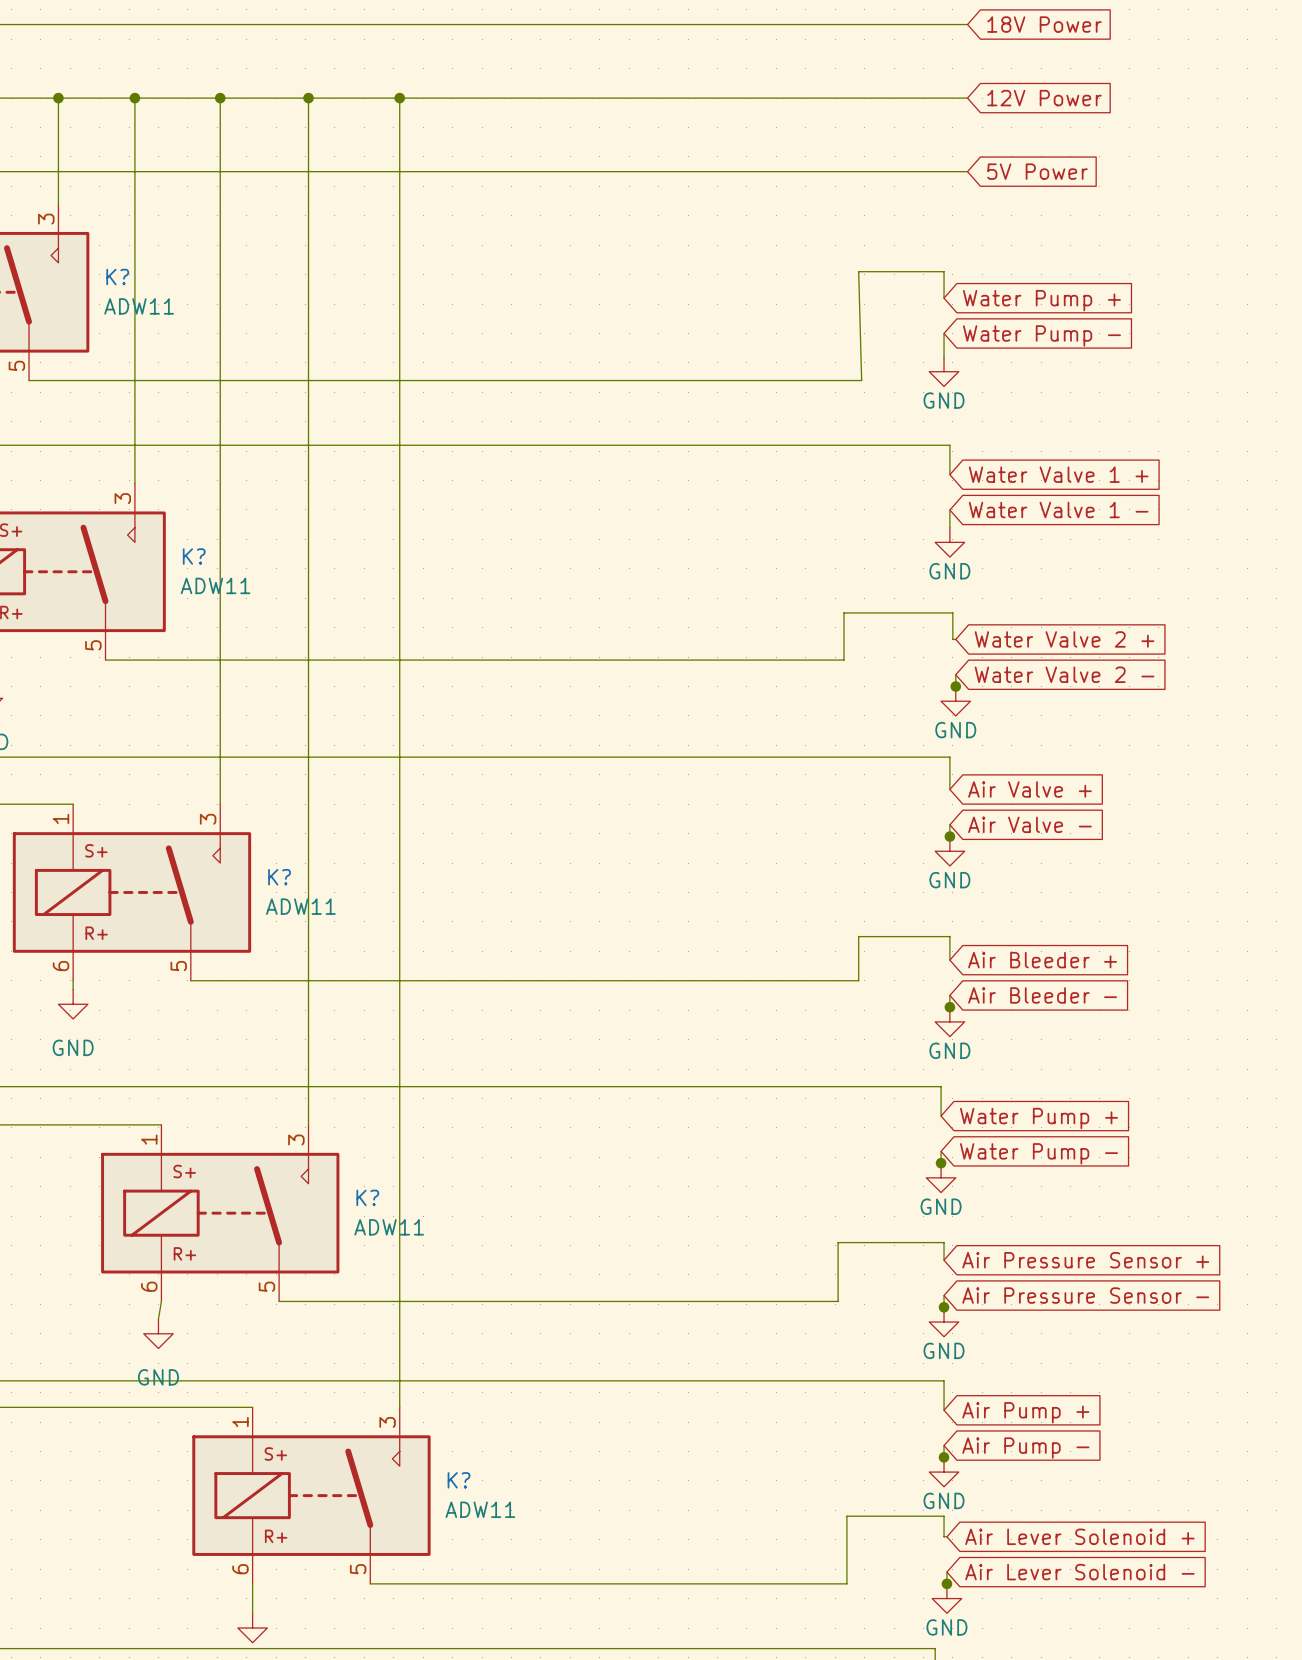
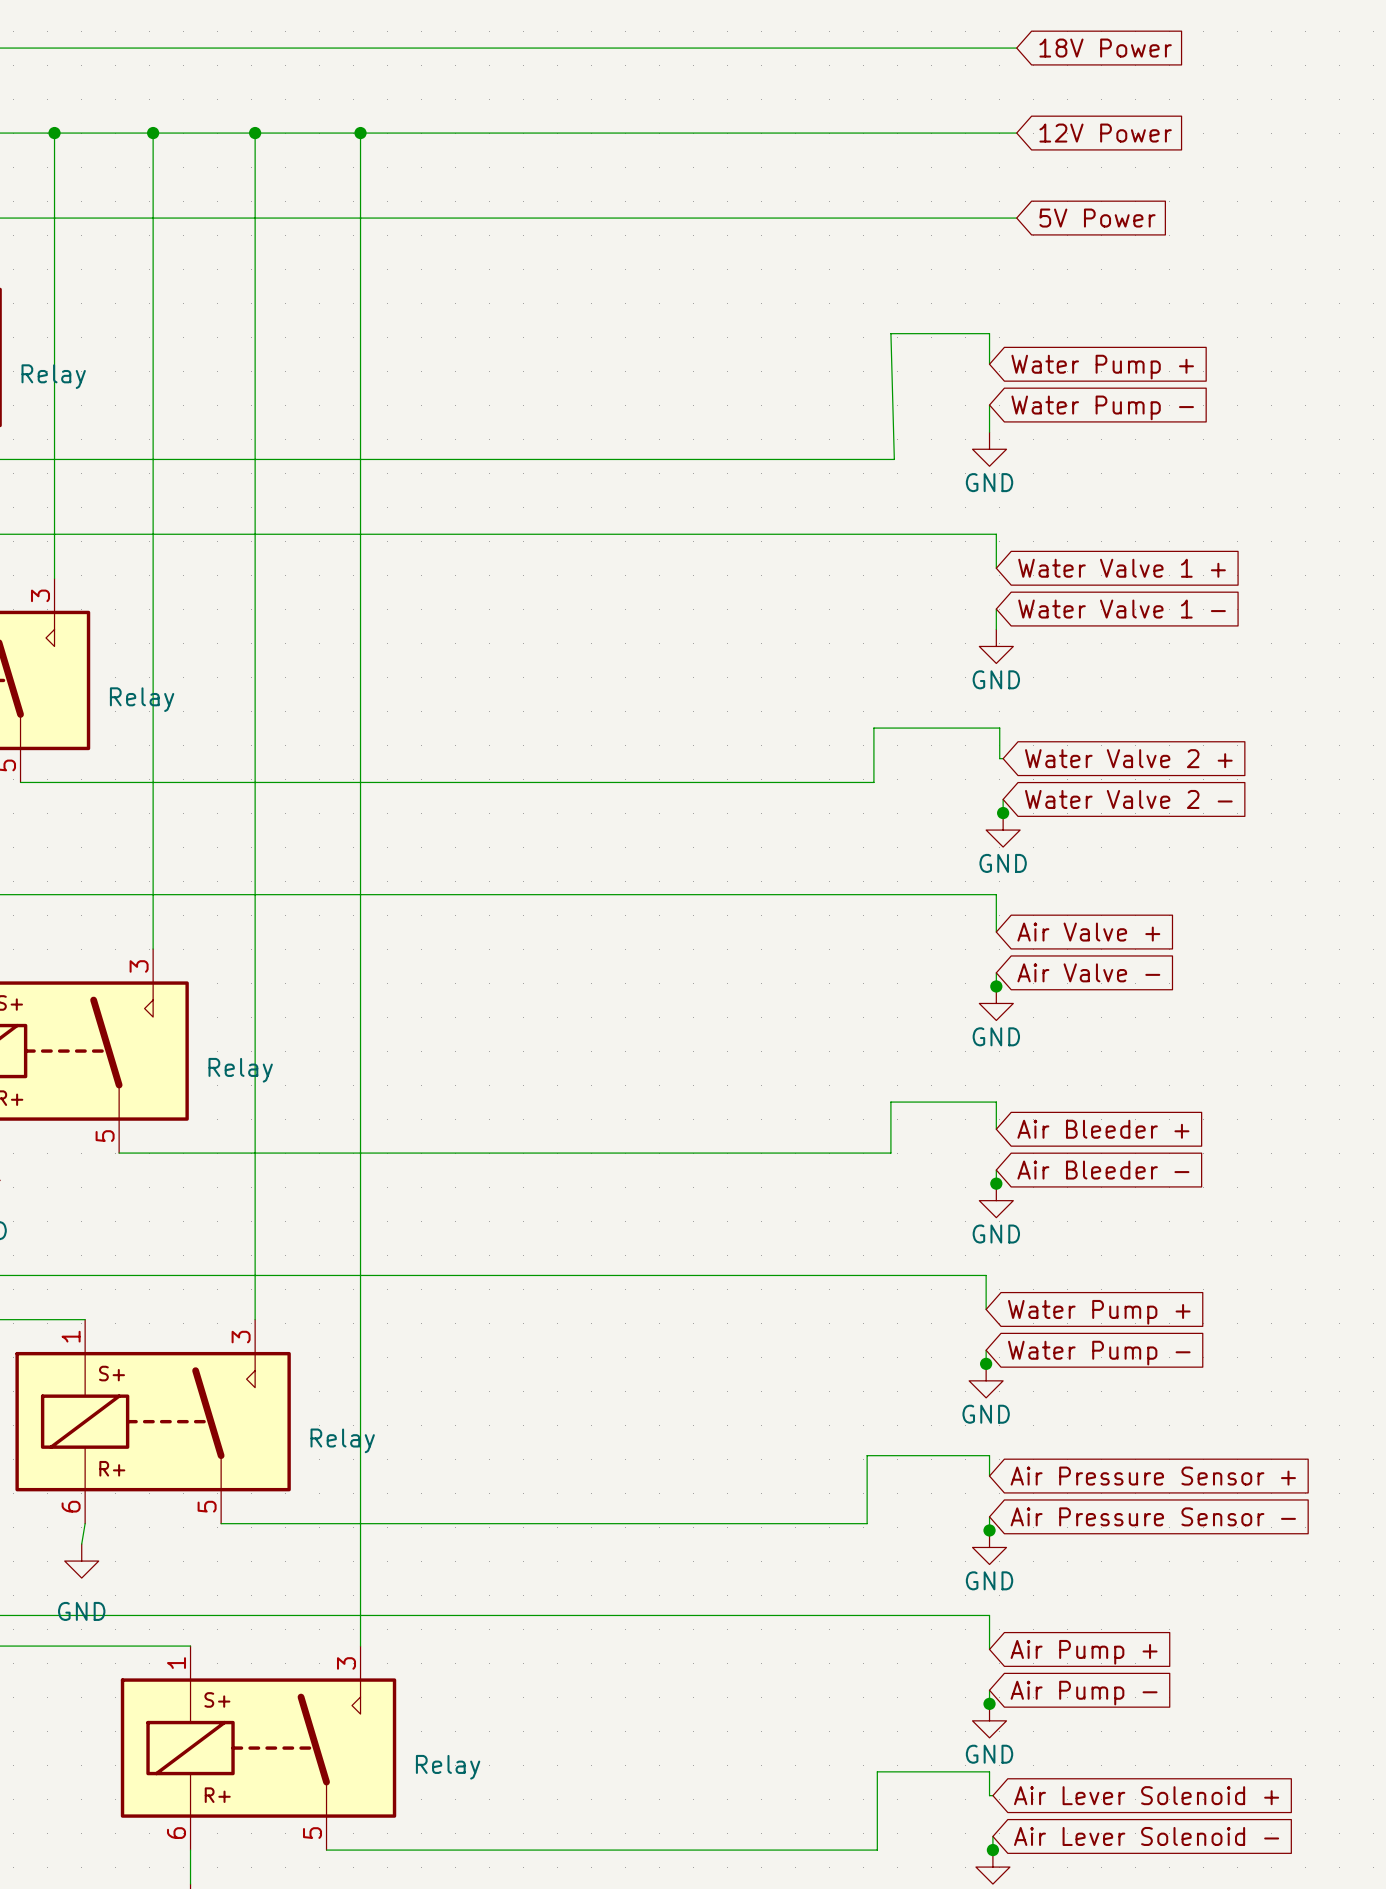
K? name: K? (117, 277) -> none
K? value: ADW11 (139, 306) -> Relay (53, 376)
K? name: K? (194, 556) -> none
K? value: ADW11 (215, 585) -> Relay (142, 699)
K? name: K? (279, 877) -> none
K? value: ADW11 (300, 906) -> Relay (240, 1070)
K? name: K? (367, 1197) -> none
K? value: ADW11 (389, 1227) -> Relay (342, 1440)
K? name: K? (459, 1480) -> none
K? value: ADW11 (480, 1509) -> Relay (448, 1767)

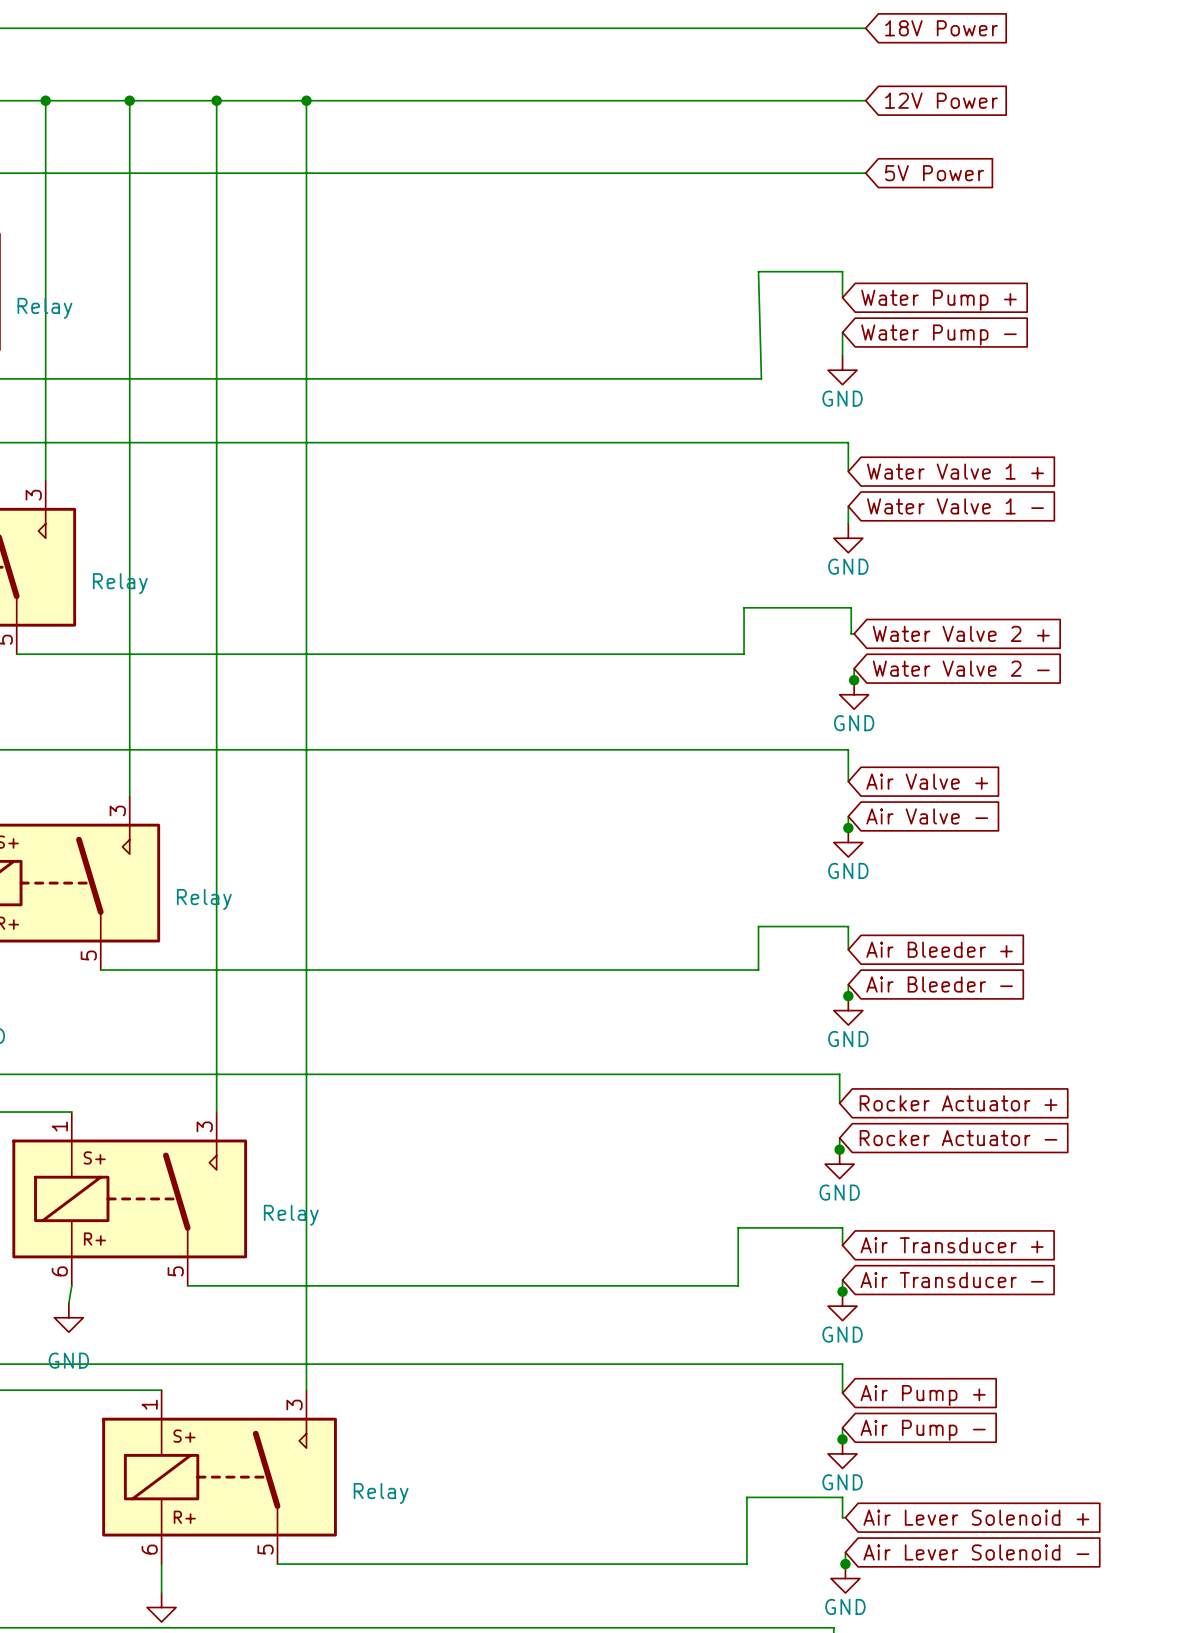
global label: Water Pump + (1099, 1312) -> Rocker Actuator + (958, 1103)
global label: Water Pump - (1099, 1353) -> Rocker Actuator - (958, 1138)
global label: Air Pressure Sensor + (1153, 1476) -> Air Transducer + (952, 1245)
global label: Air Pressure Sensor - (1153, 1516) -> Air Transducer - (952, 1280)

